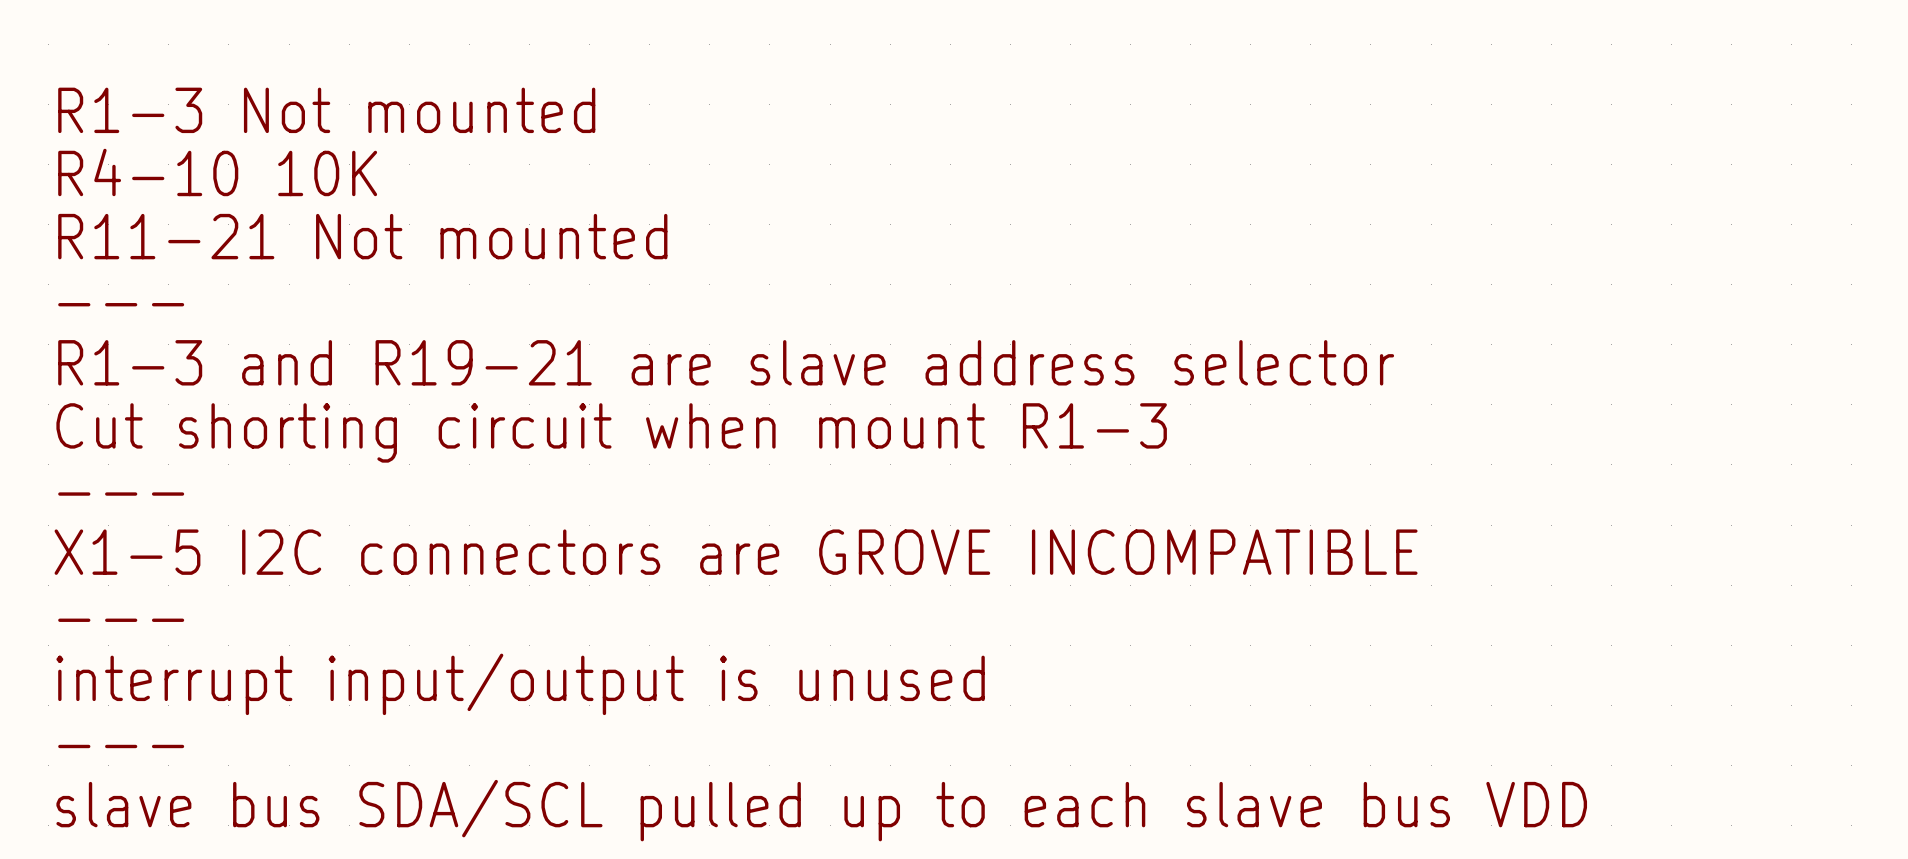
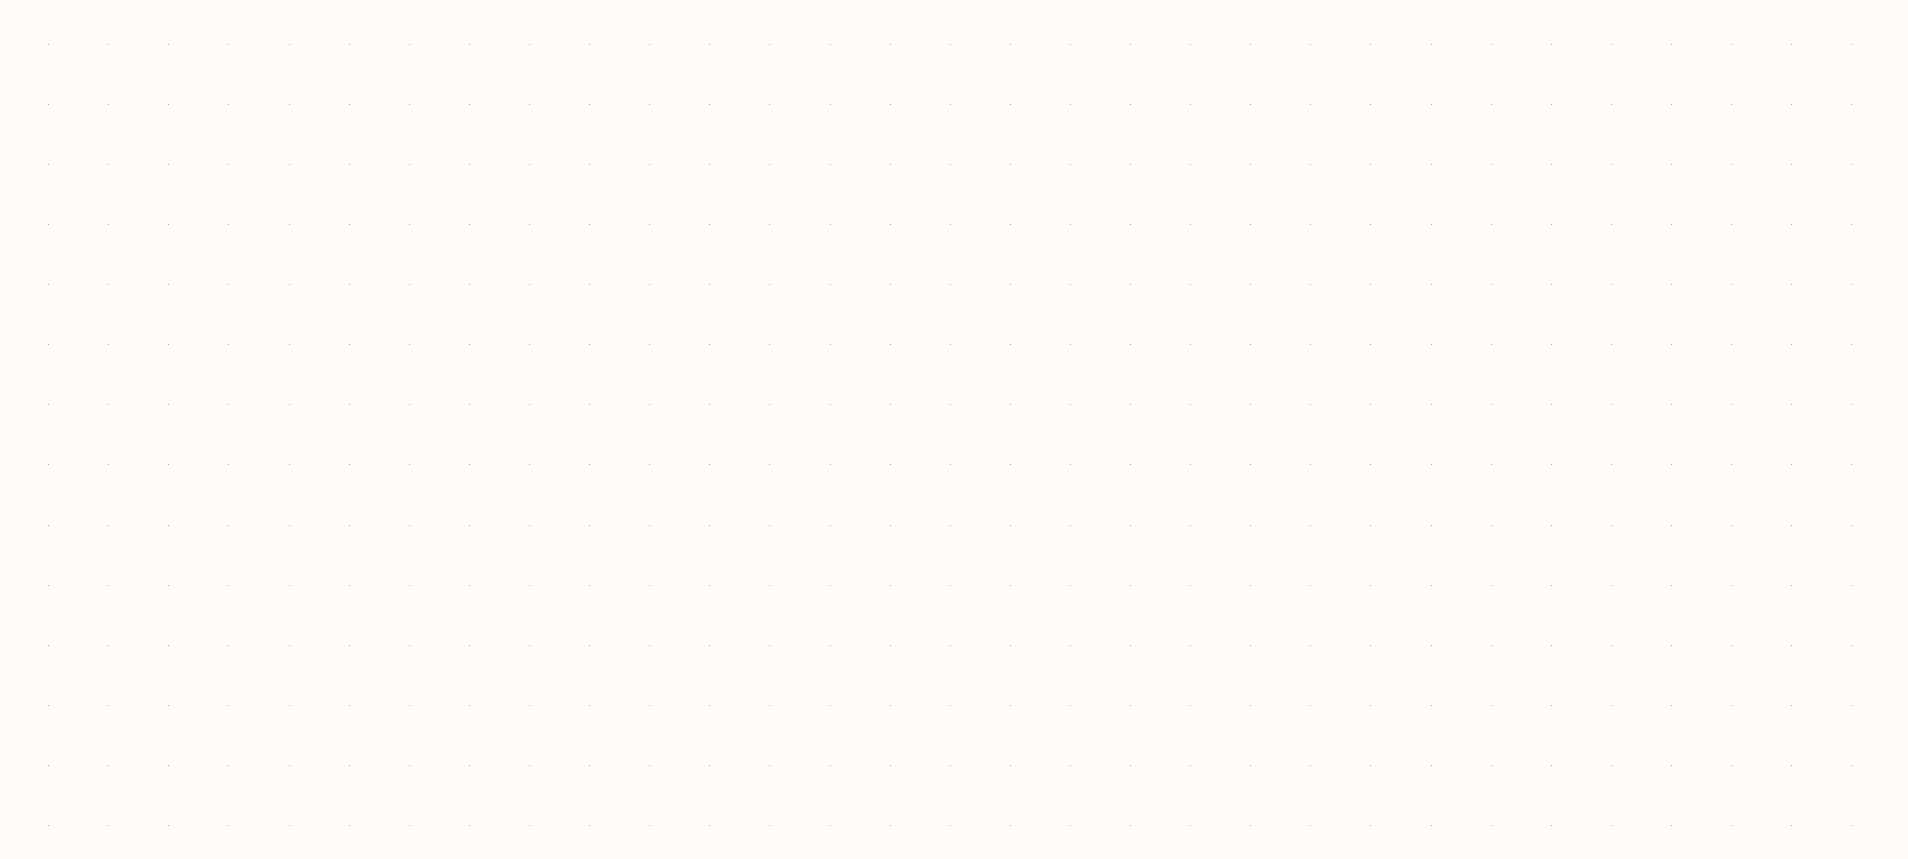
text: R1-3 Not mounted (326, 110) -> none
text: R4-10 10K (217, 172) -> none
text: R11-21 Not mounted (362, 236) -> none
text: --- (121, 304) -> none
text: R1-3 and R19-21 are slave address selector (726, 362) -> none
text: Cut shorting circuit when mount R1-3 (611, 432) -> none
text: --- (121, 494) -> none
text: X1-5 I2C connectors are GROVE INCOMPATIBLE (736, 552) -> none
text: --- (121, 620) -> none
text: interrupt input/output is unused (520, 684) -> none
text: --- (121, 746) -> none
text: slave bus SDA/SCL pulled up to each slave bus VDD (821, 810) -> none

